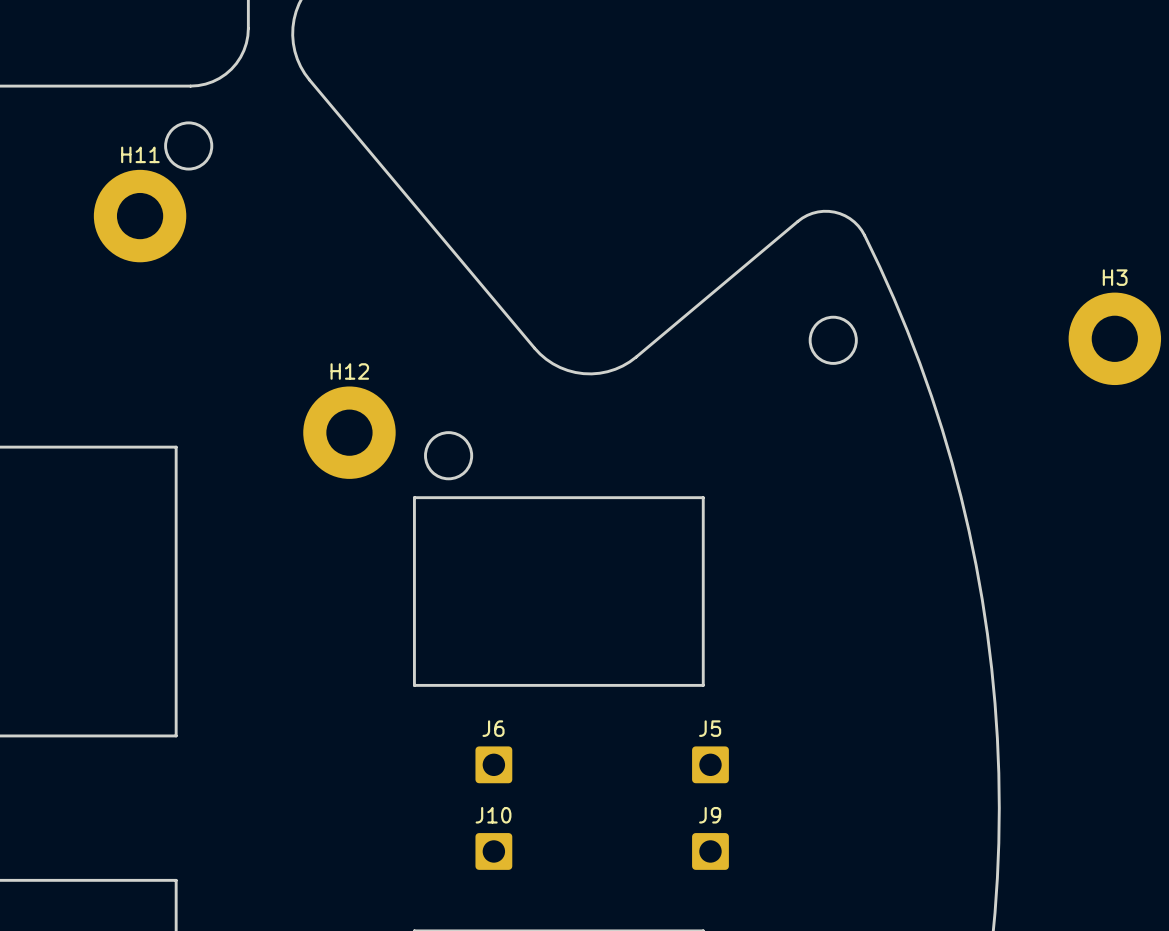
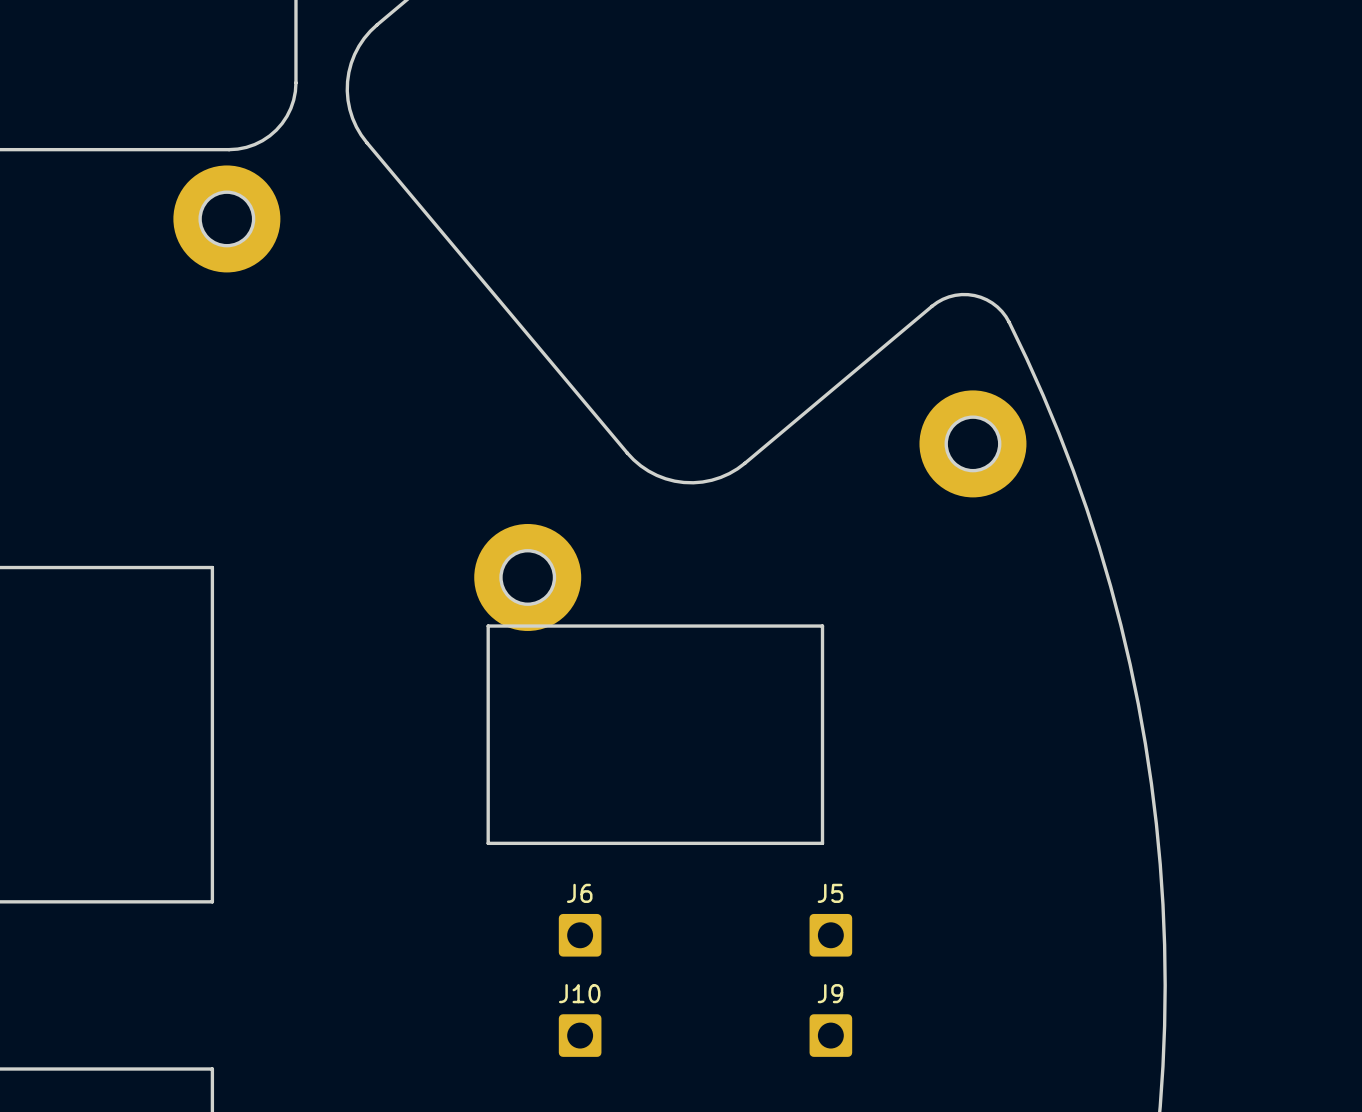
part: none -> (226, 218)
H11: (140, 216) -> none
H3: (1114, 338) -> none
part: none -> (972, 443)
H12: (349, 432) -> none
part: none -> (527, 577)

